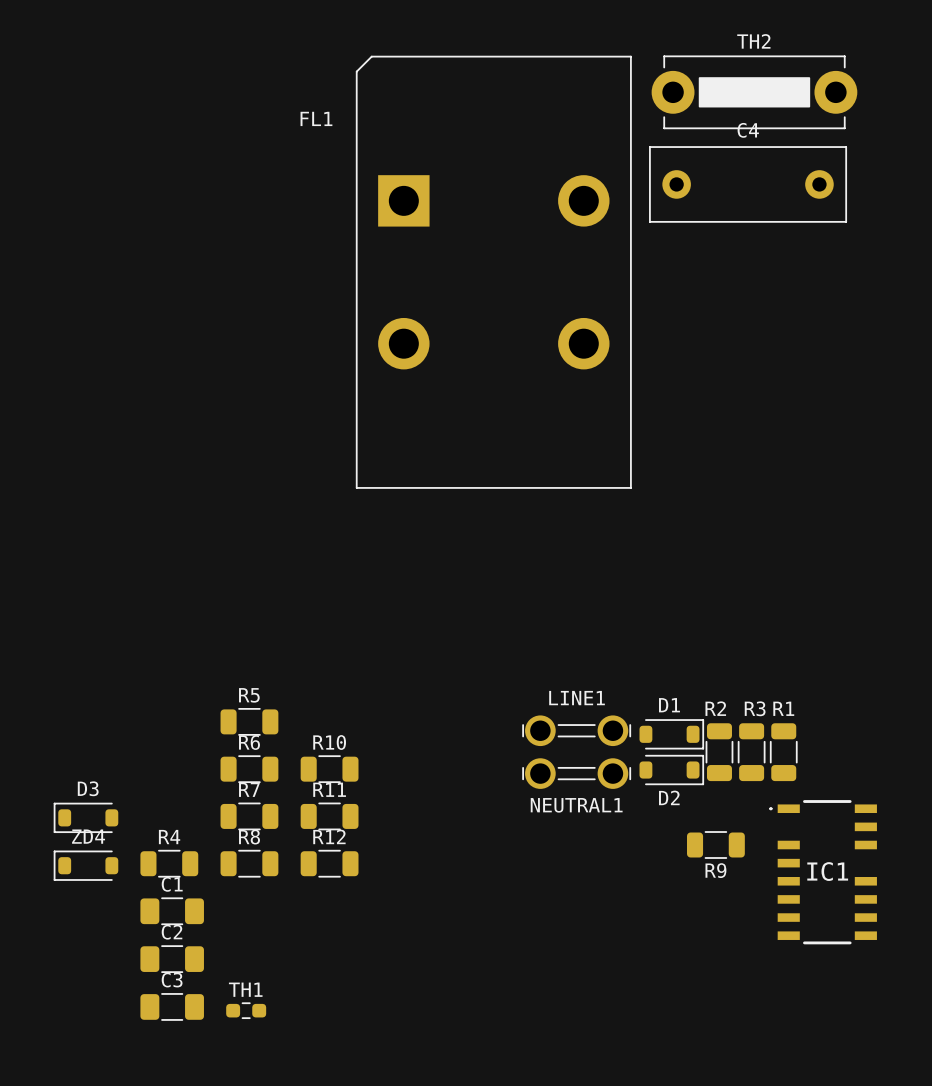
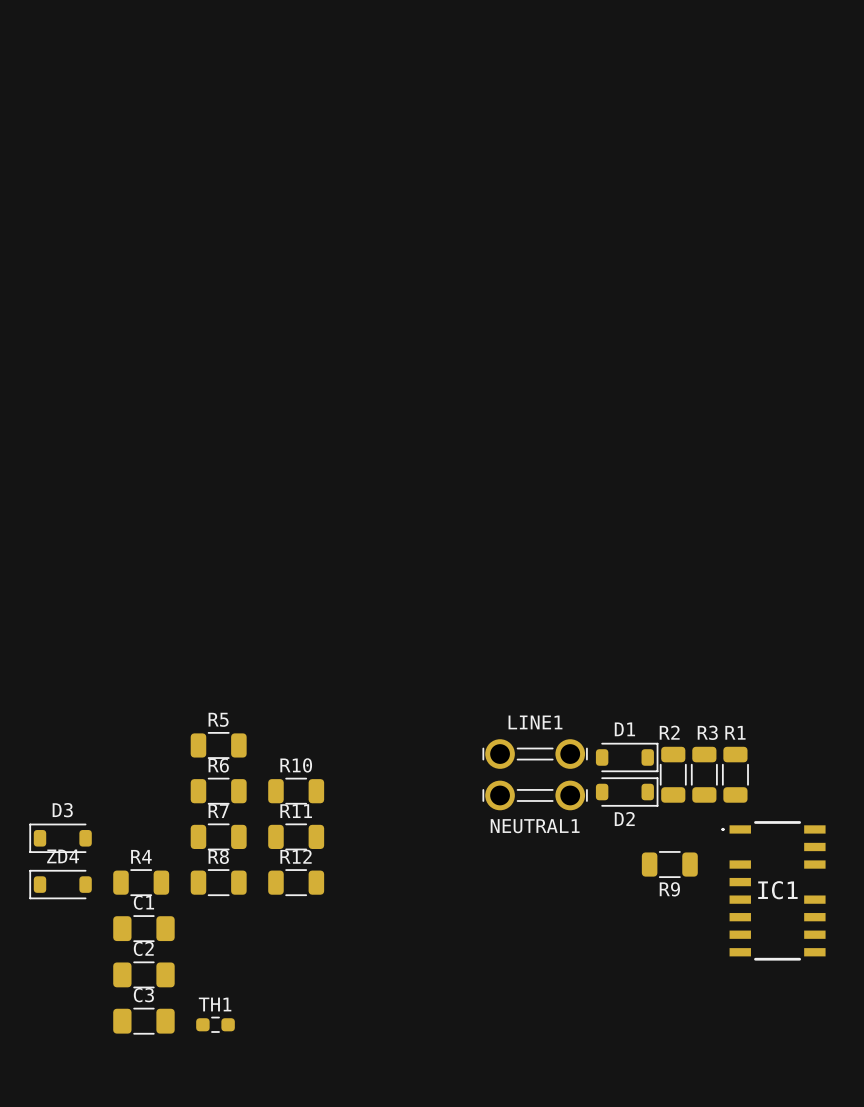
TH2: (754, 92) -> none
C4: (748, 184) -> none
FL1: (493, 272) -> none

